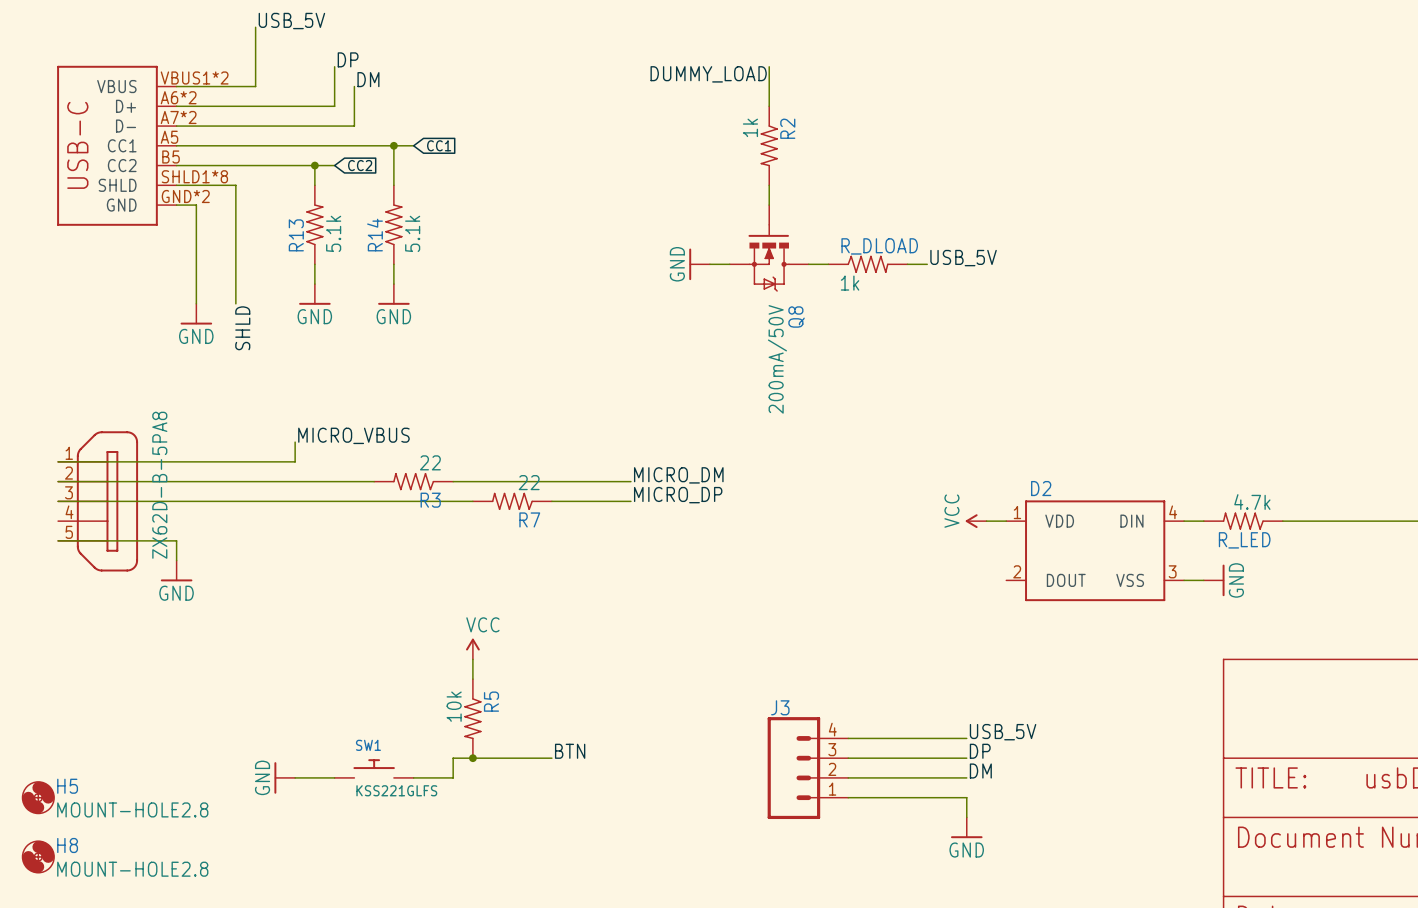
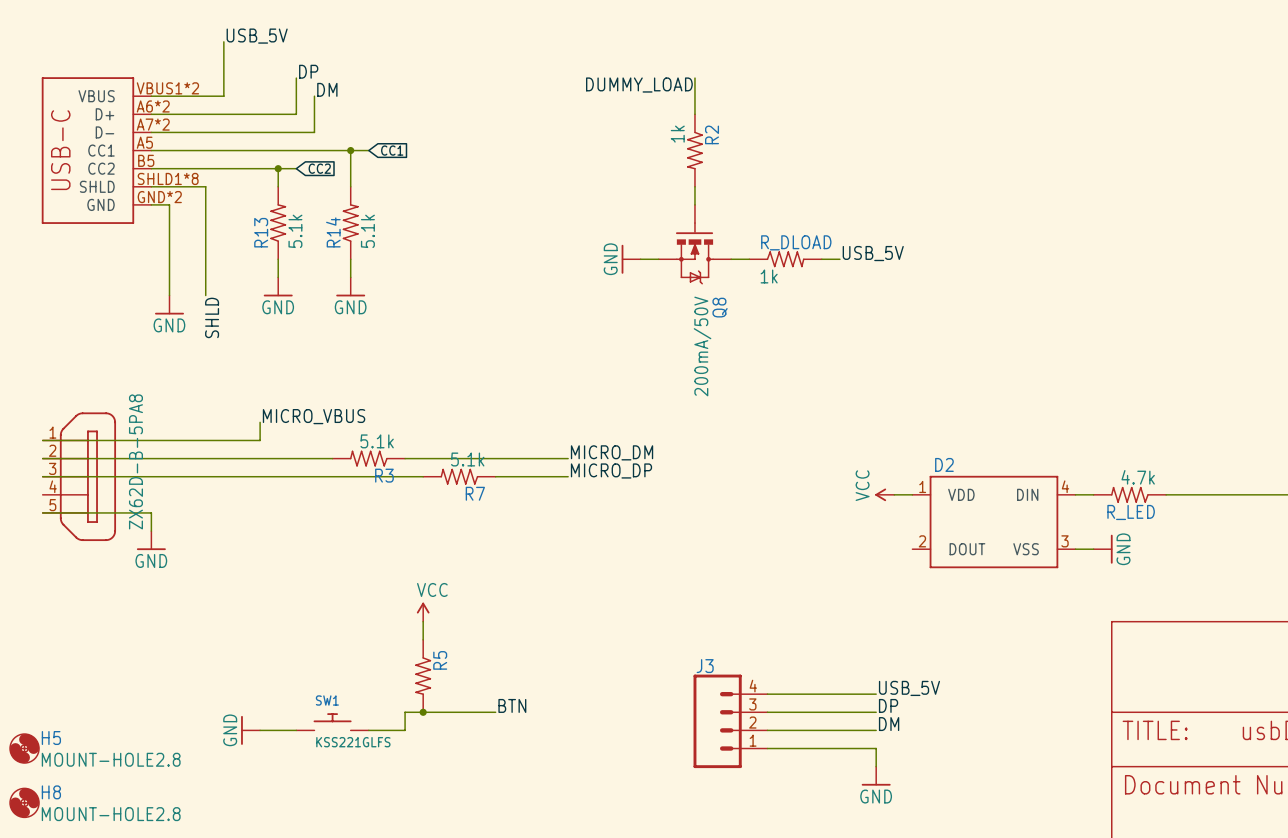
R3 value: 22 (430, 462) -> 5.1k (377, 441)
R7 value: 22 (529, 482) -> 5.1k (467, 459)
R5 value: 10k (454, 706) -> none

